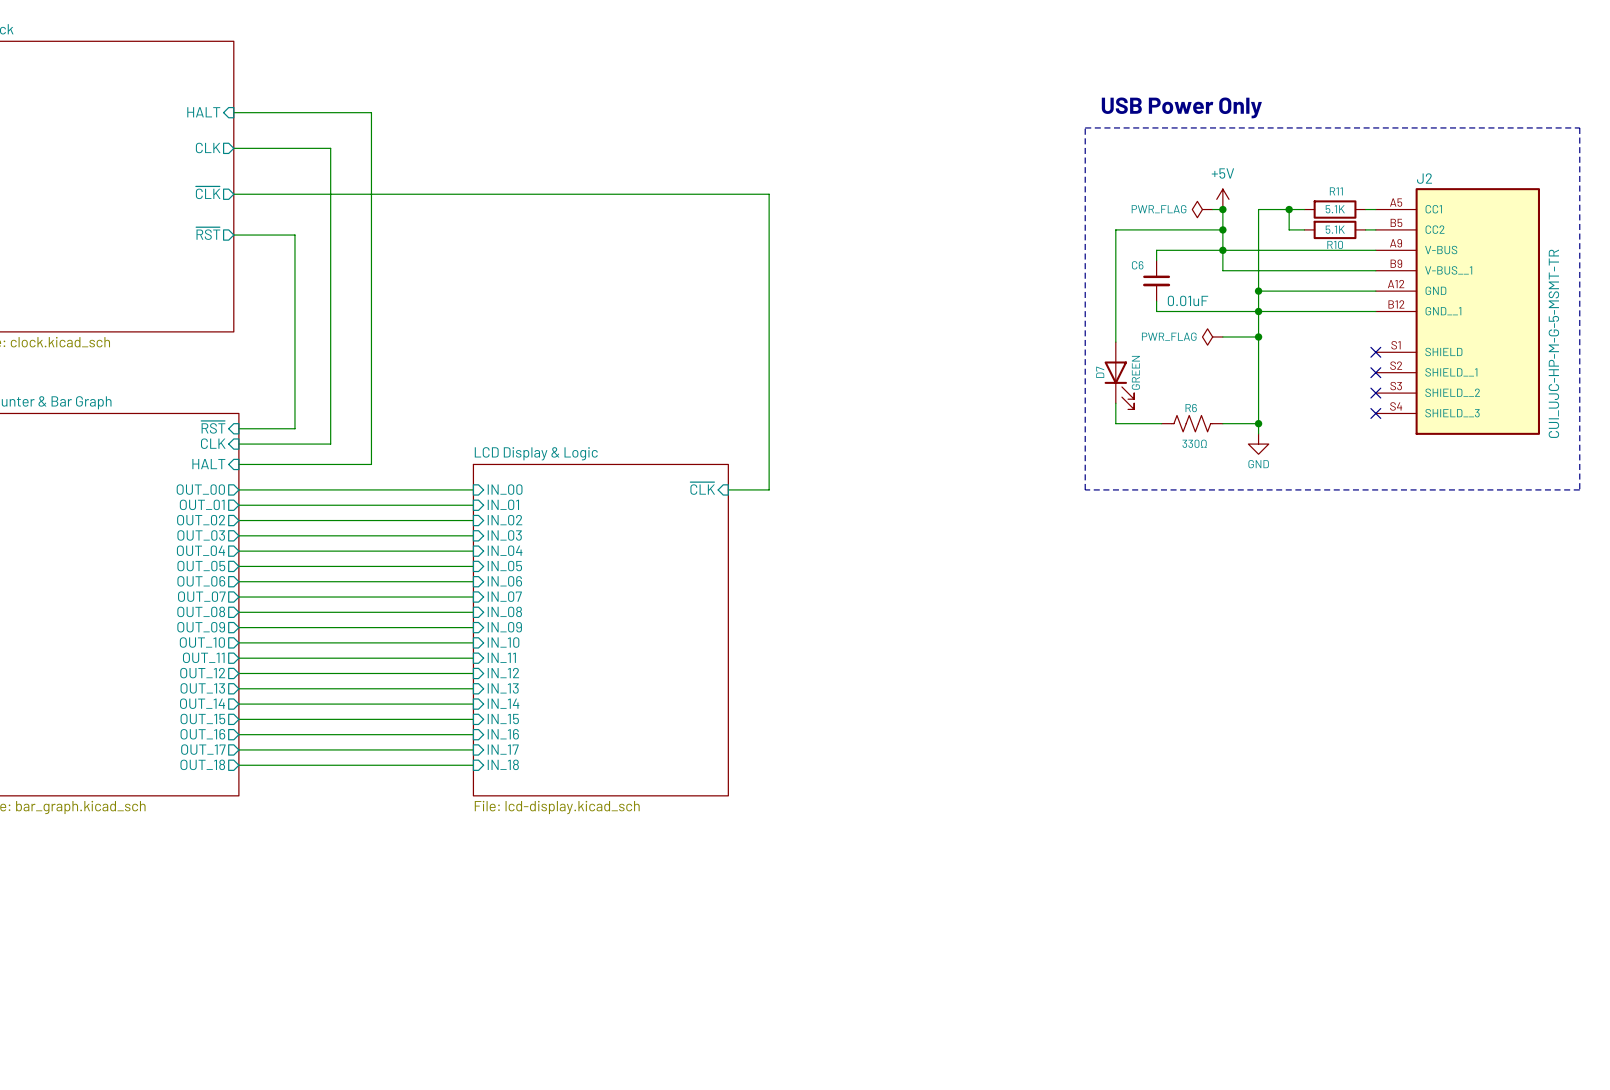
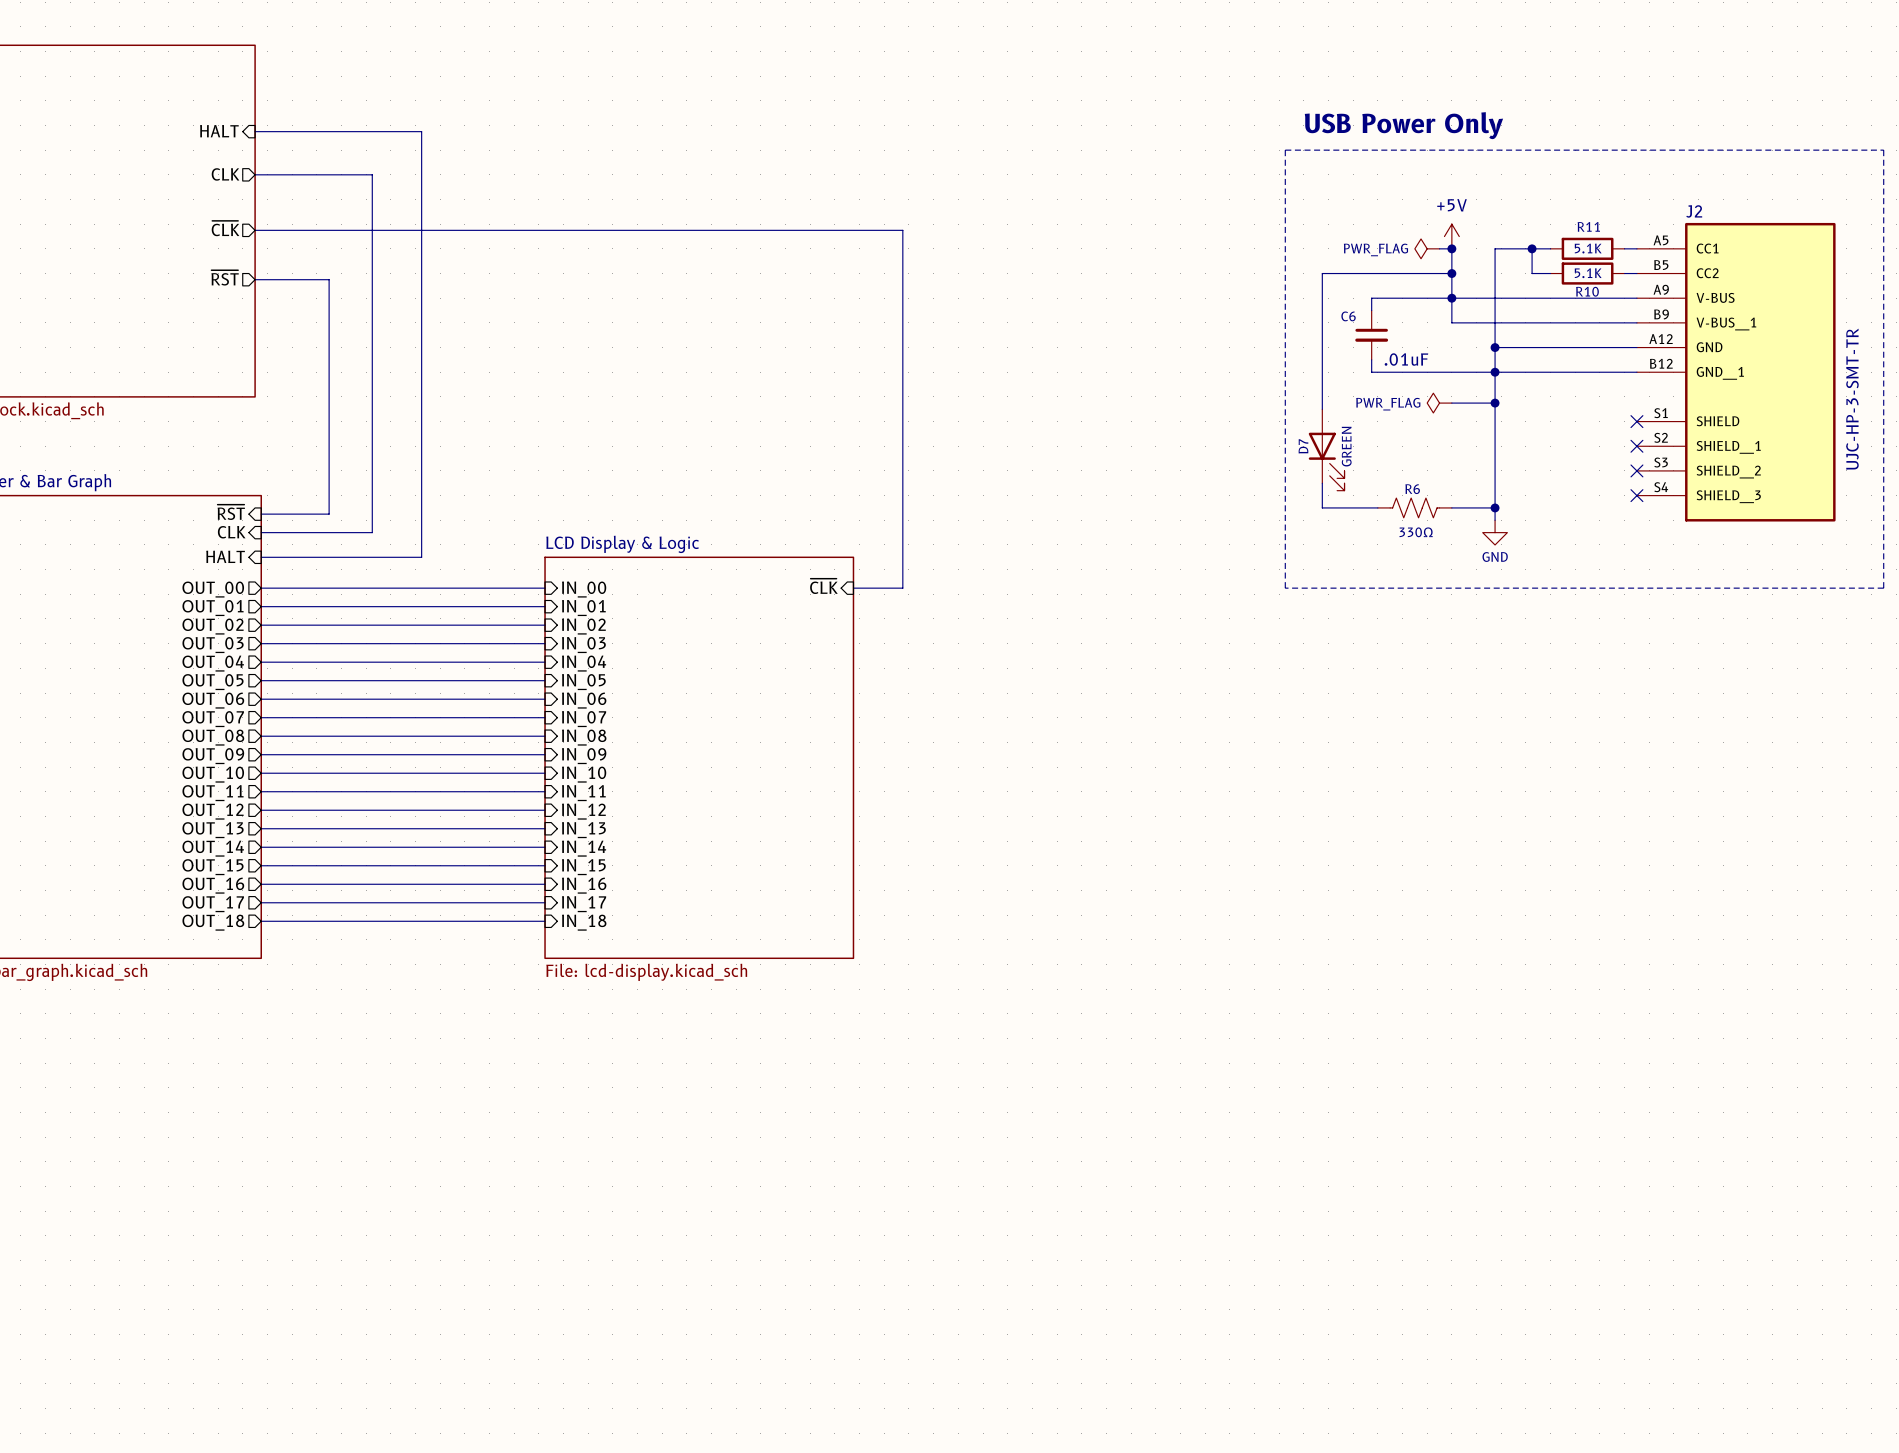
C6 value: 0.01uF (1188, 300) -> .01uF (1406, 359)
J2 value: CUI_UJC-HP-M-G-5-MSMT-TR (1553, 343) -> UJC-HP-3-SMT-TR (1852, 399)

